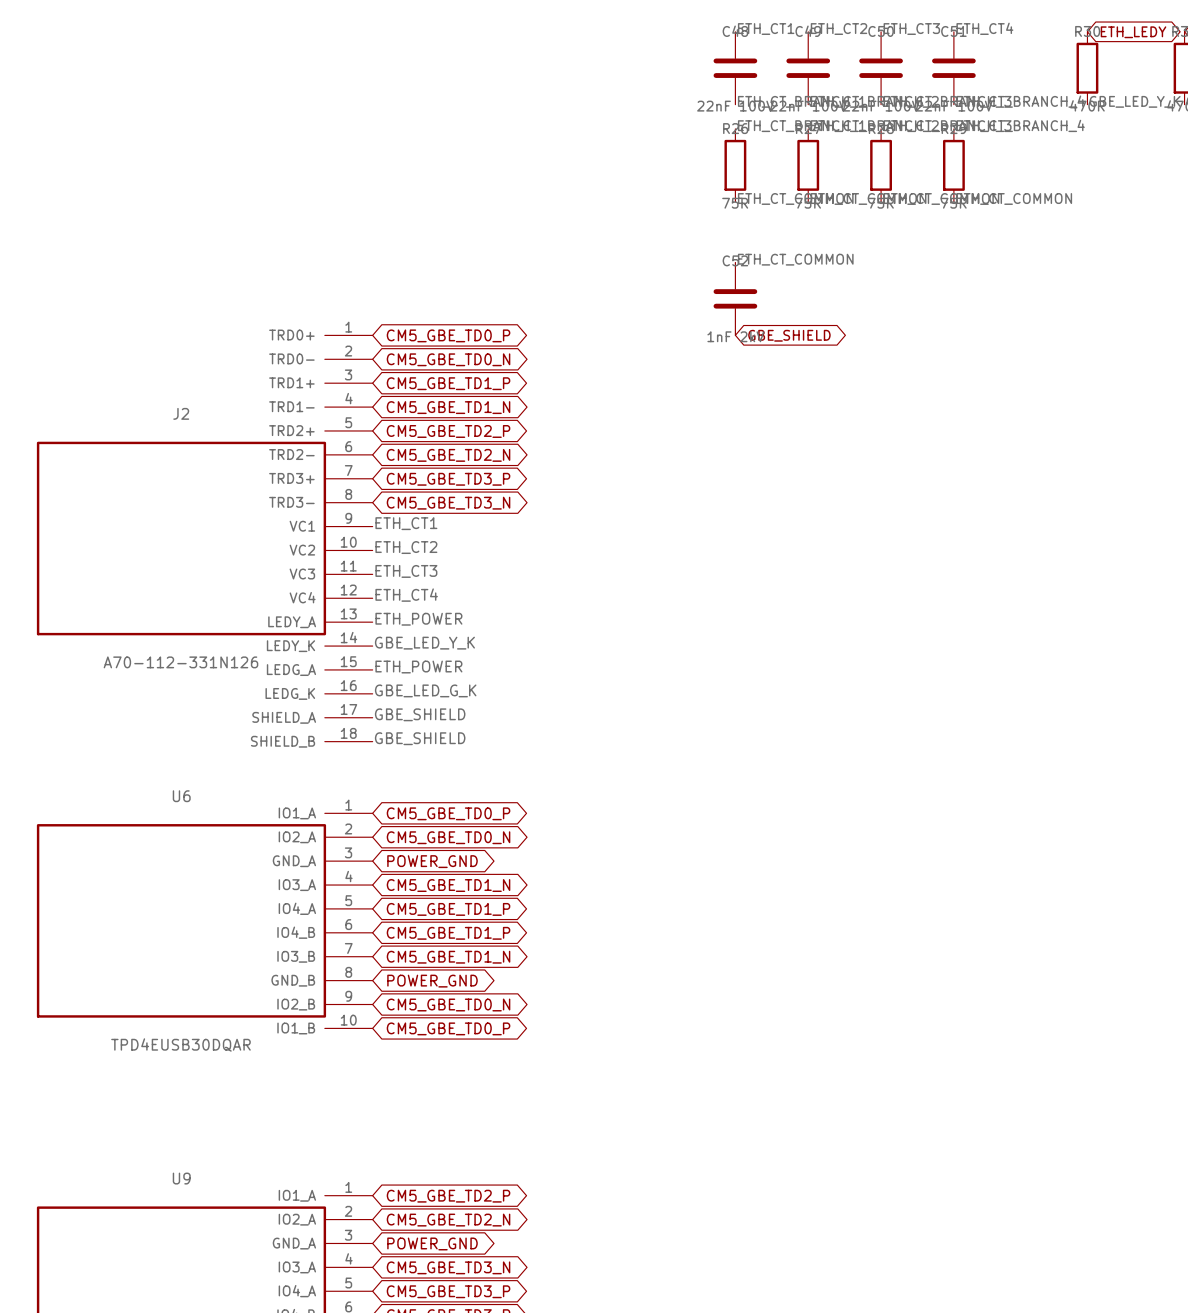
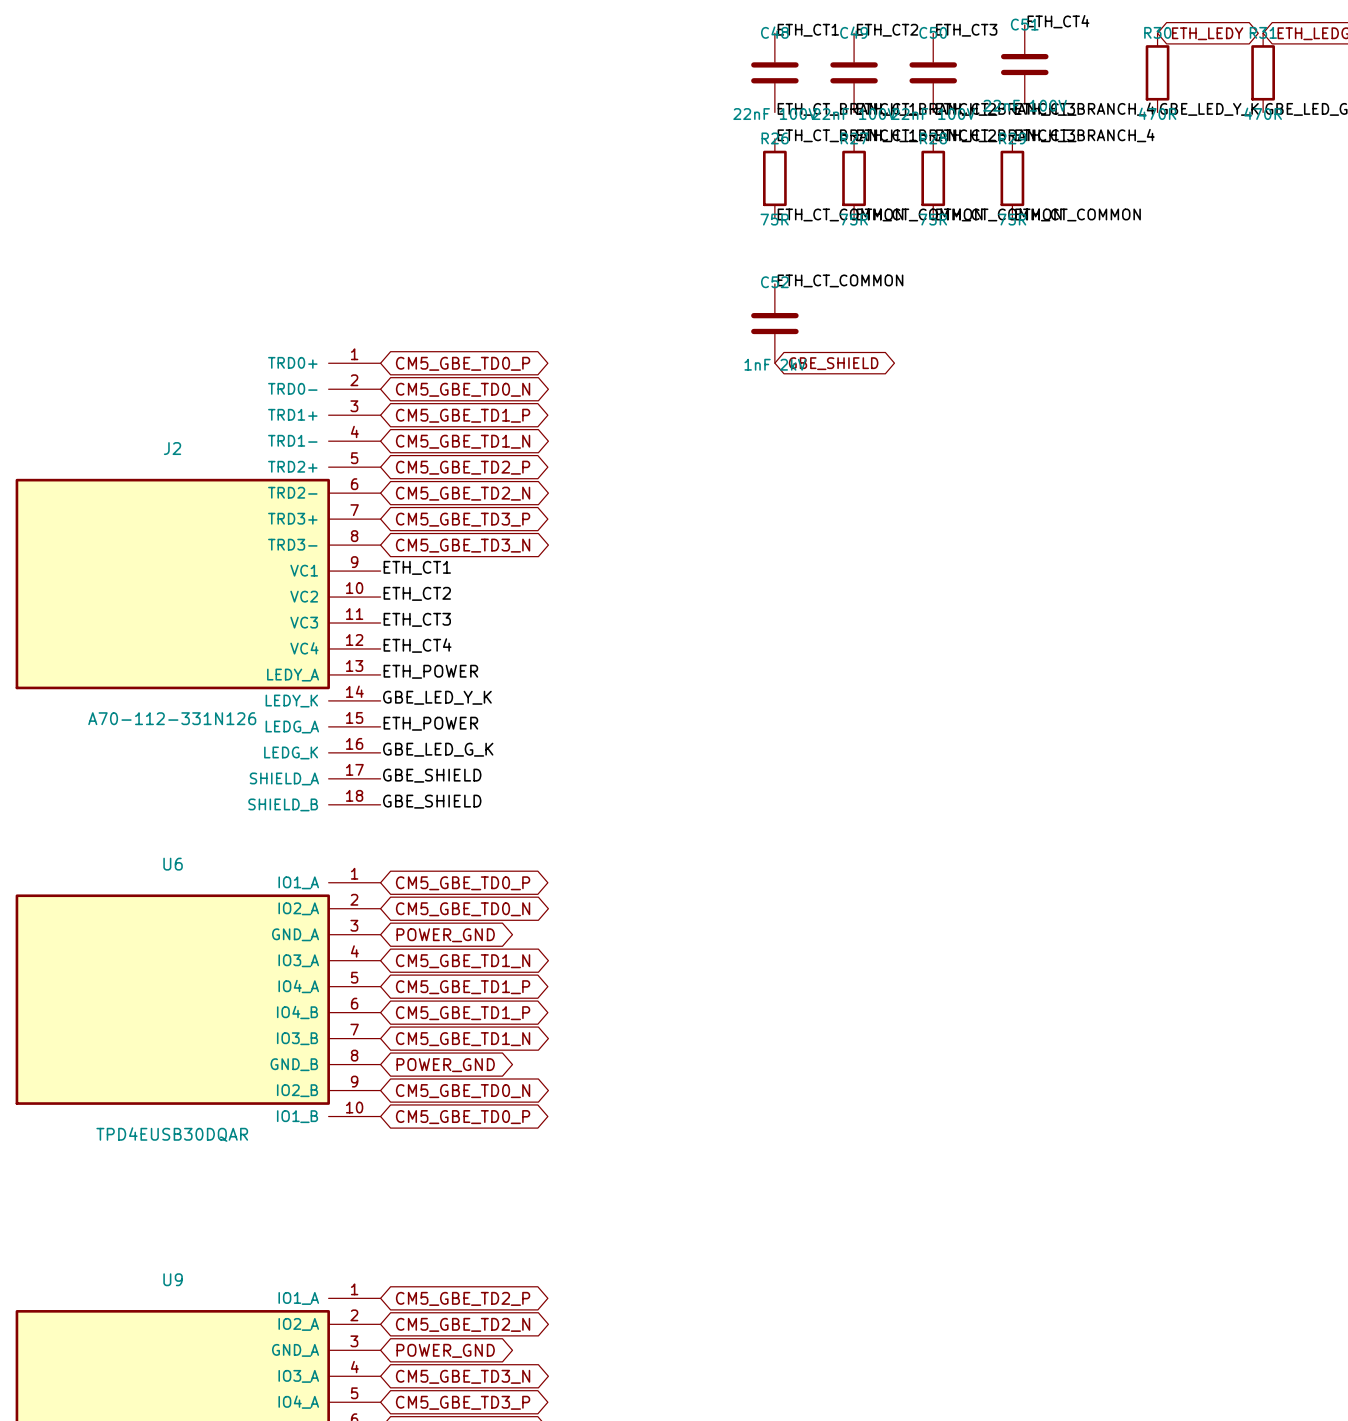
label position: ETH_CT4 (984, 28) -> ETH_CT4 (1058, 21)
C51 position: (953, 68) -> (1024, 64)

